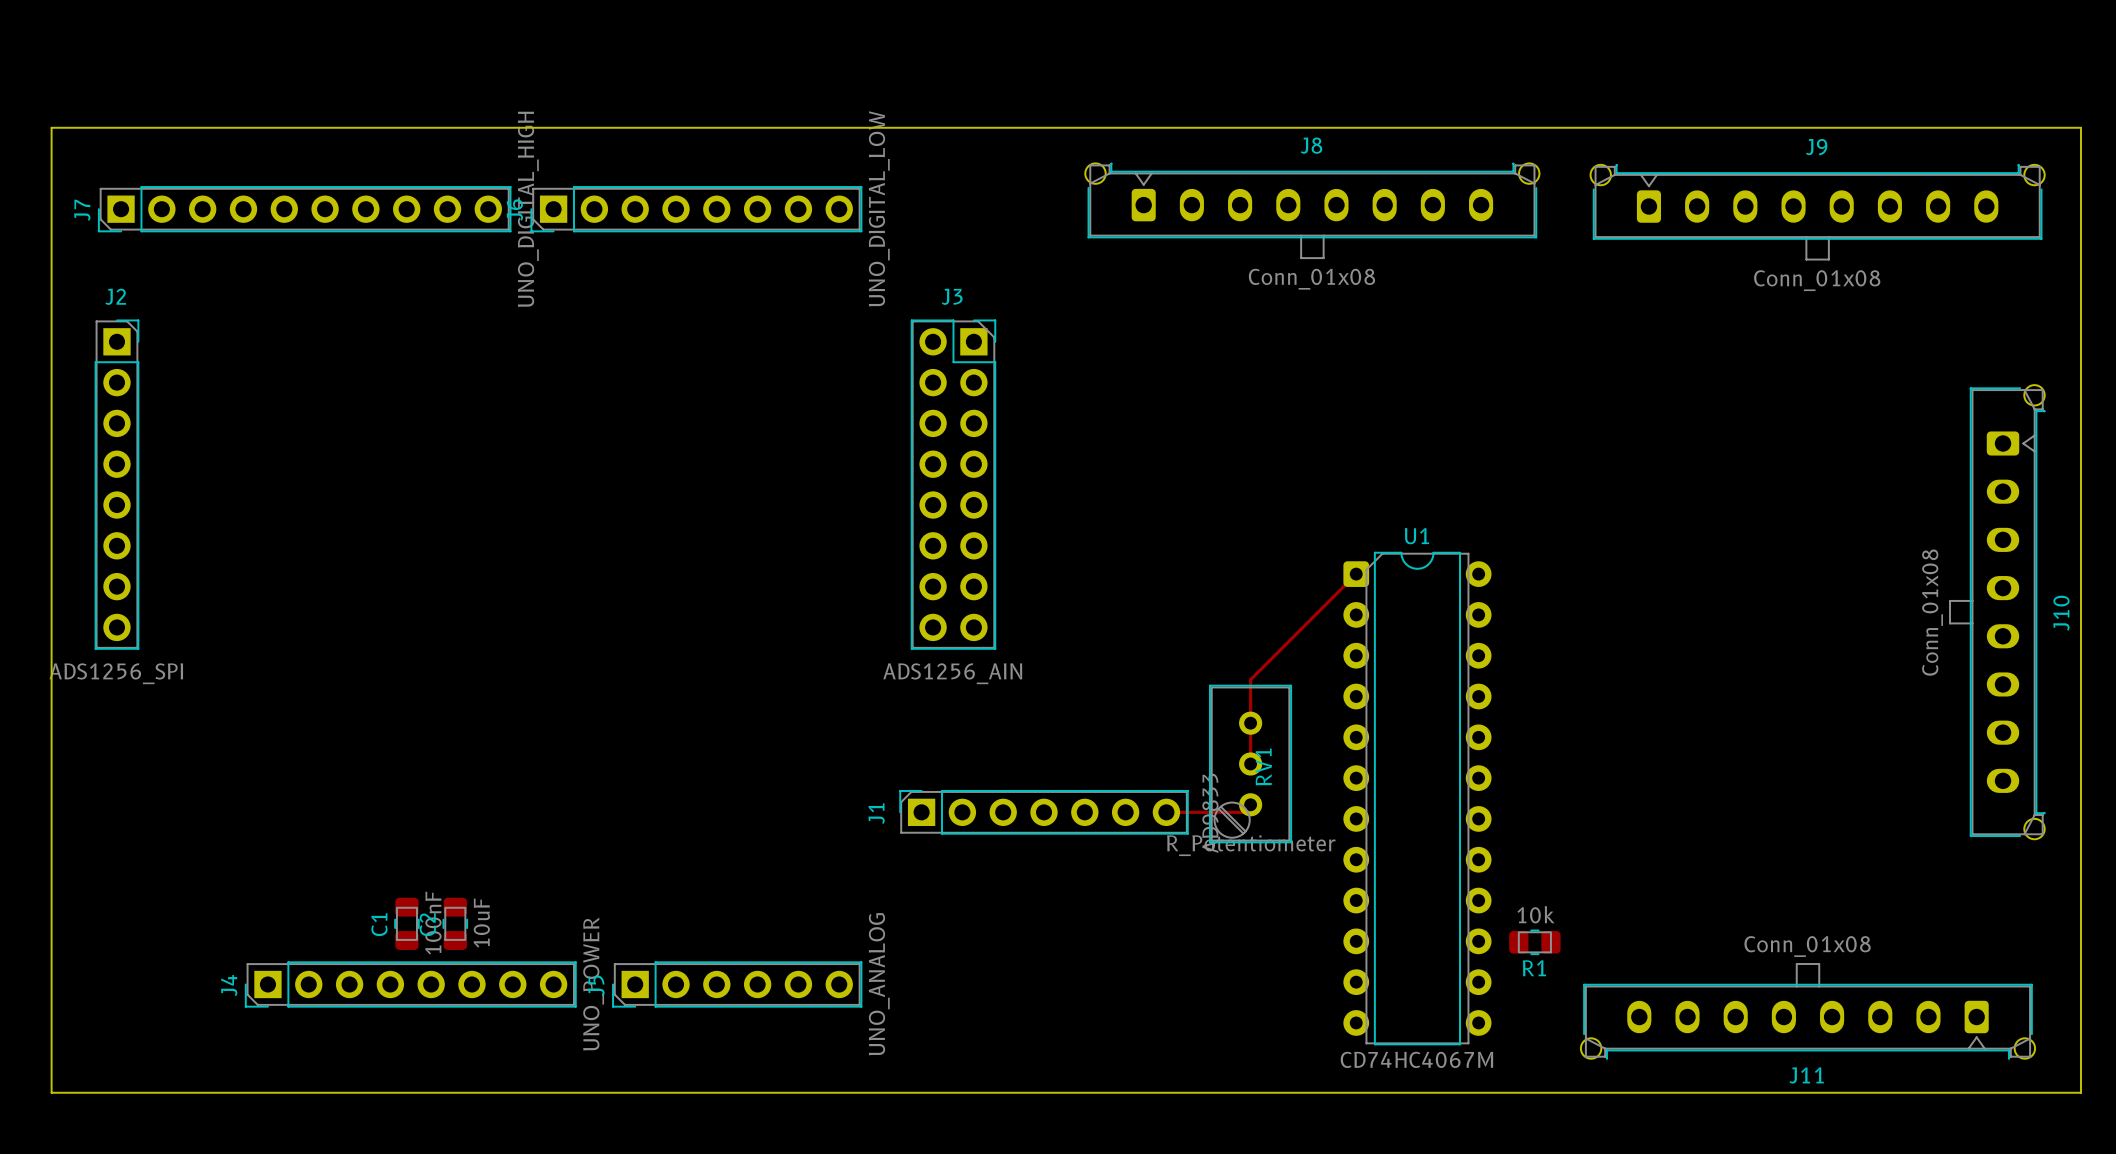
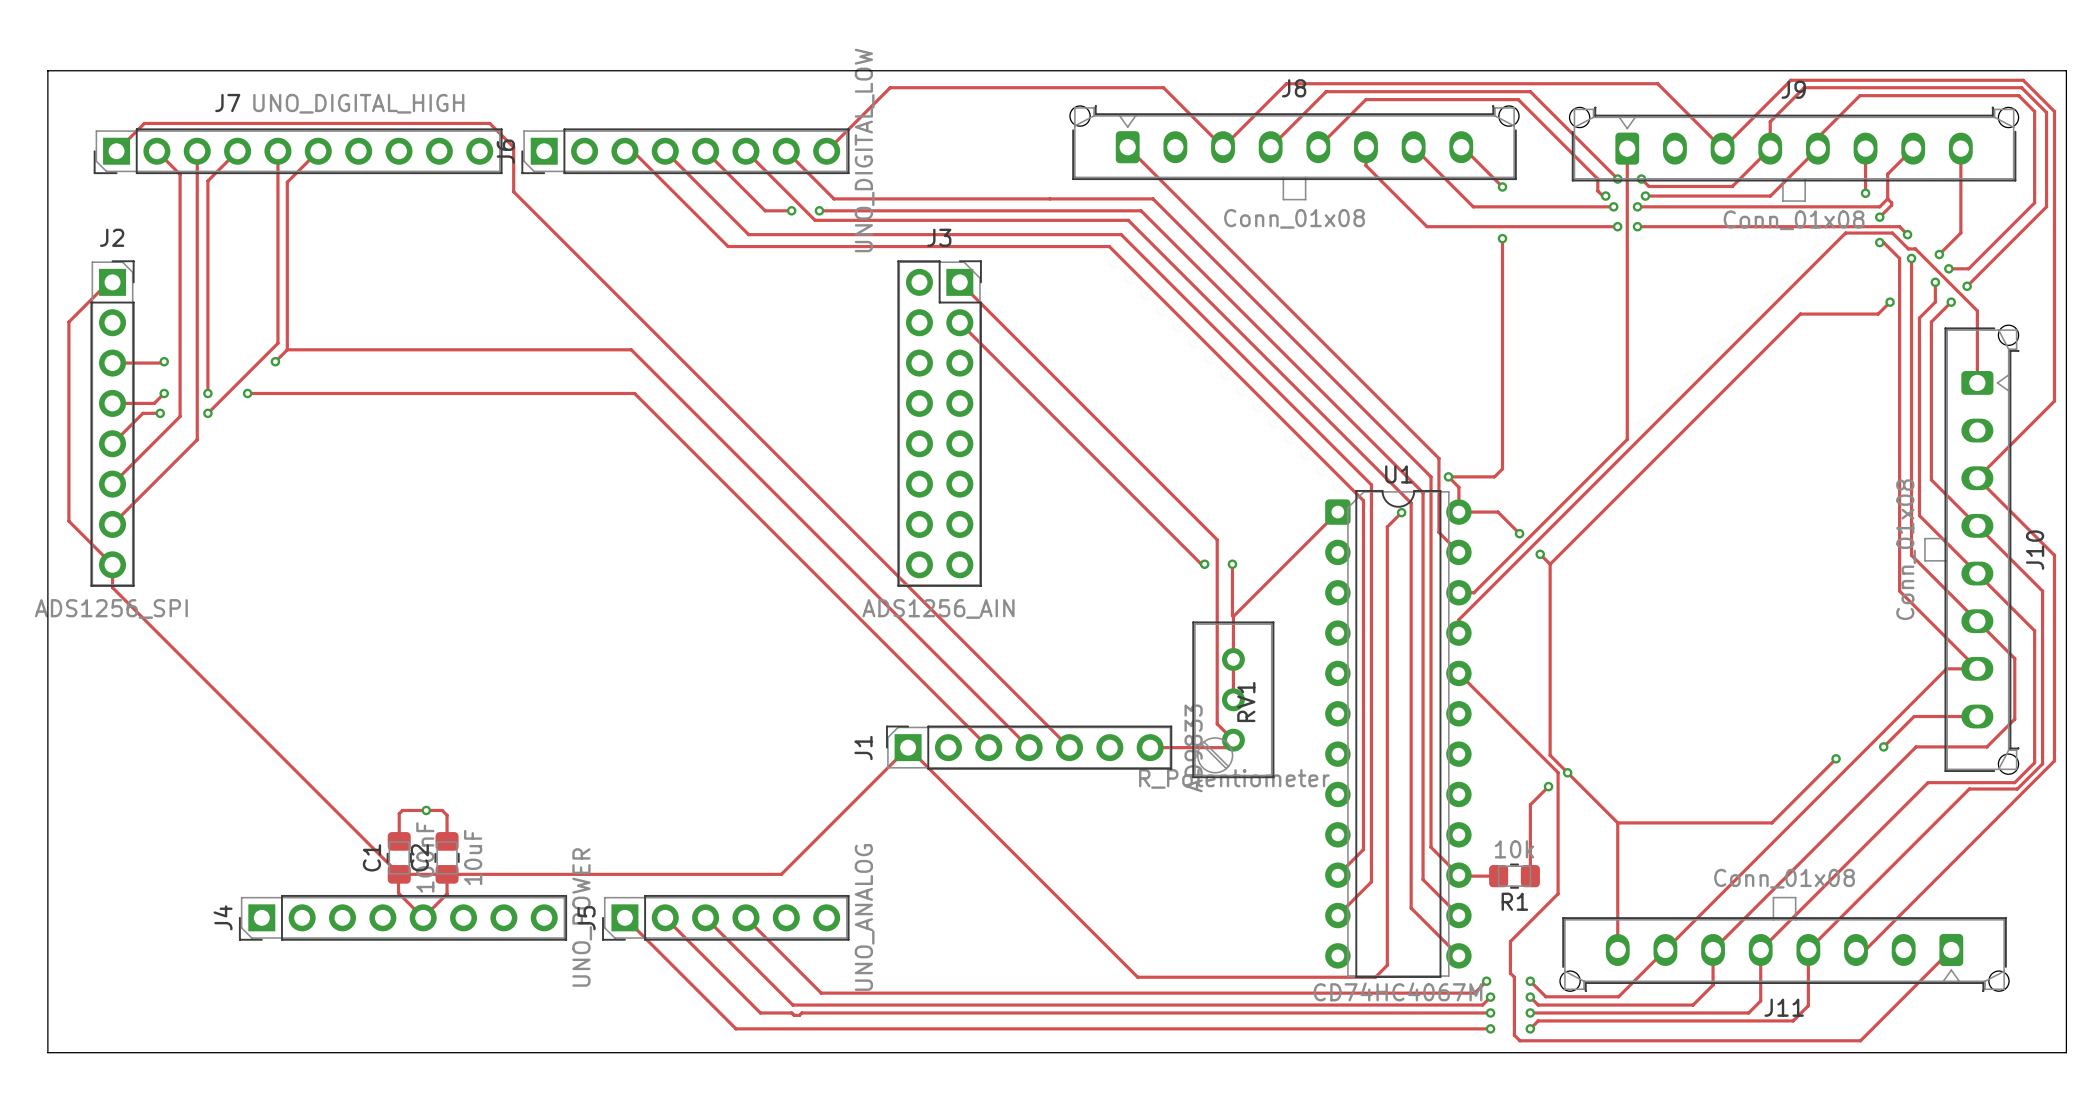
board edge: (2081, 127) (2081, 1092) (51, 1092) -> (2054, 70) (2066, 70) (2066, 1052) (47, 1052) (47, 1024)
track: none -> (1127, 147) (1438, 458) (1438, 532) (1458, 552)
track: none -> (1270, 147) (1326, 91) (1530, 91) (1617, 179)
track: none -> (1318, 147) (1365, 99) (1518, 99) (1597, 179) (1597, 190) (1602, 196) (1605, 196)
track: none -> (1365, 147) (1365, 165) (1427, 226) (1617, 226)
track: none -> (1413, 147) (1473, 206) (1613, 206)
track: none -> (1461, 147) (1502, 186)
track: none -> (1627, 148) (1627, 439) (1473, 592) (1458, 592)
track: none -> (1865, 148) (1865, 193)
track: none -> (1913, 148) (1887, 174) (1887, 198)
track: none -> (1960, 148) (1960, 232) (1939, 254)
track: none -> (116, 151) (144, 123) (489, 123) (513, 147) (513, 191) (1069, 747)
track: none -> (156, 151) (180, 174) (180, 416) (112, 484)
track: none -> (197, 151) (197, 439) (112, 524)
track: none -> (237, 151) (207, 180) (207, 393)
track: none -> (277, 151) (277, 343) (207, 413)
track: none -> (318, 151) (287, 182) (287, 349)
J7 value rotation: 0° (528, 209) -> 90° clockwise (358, 103)
track: none -> (624, 151) (632, 151) (728, 246) (1109, 246) (1363, 500) (1363, 849) (1337, 875)
track: none -> (665, 151) (748, 234) (1121, 234) (1371, 484) (1371, 881) (1337, 915)
track: none -> (705, 151) (765, 210) (791, 210)
track: none -> (745, 151) (815, 220) (1128, 220) (1411, 503) (1411, 908) (1458, 955)
track: none -> (786, 151) (833, 198) (1153, 198) (1431, 476) (1431, 847) (1459, 876) (1498, 876)
track: none -> (826, 151) (890, 87) (1163, 87) (1223, 147) (1286, 83) (1657, 83) (1722, 148) (1790, 80) (2023, 80) (2054, 111) (2054, 401) (1977, 478) (2054, 555) (2054, 760) (1865, 950) (1856, 950)
J7 name rotation: 0° (82, 210) -> 90° clockwise (227, 103)
J7 name position: J7 (82, 210) -> J7 (227, 103)
via: none -> (1617, 179)
track: none -> (1641, 179) (1648, 186) (1732, 186) (1770, 148) (1770, 121) (1804, 87) (2021, 87) (2046, 112) (2046, 206) (1967, 286)
via: none -> (1641, 179)
via: none -> (1502, 186)
via: none -> (1865, 193)
via: none -> (1605, 196)
track: none -> (1645, 196) (1770, 196) (1817, 148) (1817, 137) (1859, 95) (2018, 95) (2034, 111) (2034, 202) (1968, 268) (1948, 268)
via: none -> (1645, 196)
track: none -> (1887, 198) (1891, 205) (1879, 217)
track: none -> (1887, 198) (1879, 206) (1637, 206)
via: none -> (1613, 206)
via: none -> (1637, 206)
via: none -> (791, 210)
track: none -> (819, 210) (1141, 210) (1423, 492) (1423, 879) (1458, 915)
via: none -> (819, 210)
via: none -> (1879, 217)
via: none -> (1617, 226)
track: none -> (1637, 226) (1899, 226) (1907, 234)
via: none -> (1637, 226)
via: none -> (1907, 234)
track: none -> (1502, 238) (1502, 468) (1494, 476) (1448, 476) (1458, 487) (1458, 512) (1497, 512) (1519, 533)
via: none -> (1502, 238)
track: none -> (1879, 242) (1883, 242) (1899, 258) (1899, 591) (1977, 668) (1946, 668) (1618, 996) (1545, 996) (1530, 981)
via: none -> (1879, 242)
via: none -> (1939, 254)
track: none -> (1911, 258) (1911, 555) (2014, 658) (2014, 719) (1986, 746) (1916, 746) (1713, 950) (1713, 985) (1693, 1005) (1538, 1005) (1530, 997)
via: none -> (1911, 258)
via: none -> (1948, 268)
track: none -> (112, 282) (108, 282) (68, 322) (68, 521) (112, 564) (112, 587) (399, 874)
track: none -> (959, 282) (1217, 539) (1217, 723) (1233, 740)
track: none -> (1935, 282) (1935, 302) (1919, 318) (1919, 515) (2034, 630) (2034, 762) (2014, 782) (1928, 782) (1760, 950) (1760, 1000) (1748, 1012) (1530, 1012)
via: none -> (1935, 282)
via: none -> (1967, 286)
track: none -> (1890, 302) (1878, 314) (1800, 314) (1550, 564)
via: none -> (1890, 302)
track: none -> (1951, 302) (1931, 322) (1931, 479) (2042, 591) (2042, 763) (2017, 789) (1969, 789) (1808, 950) (1808, 1005) (1793, 1020) (1538, 1020) (1530, 1028)
via: none -> (1951, 302)
track: none -> (959, 322) (1201, 564) (1204, 564)
track: none -> (287, 349) (631, 349) (1029, 747)
track: none -> (287, 349) (275, 361)
track: none -> (164, 361) (112, 363)
via: none -> (164, 361)
via: none -> (275, 361)
track: none -> (1977, 382) (1977, 310) (1915, 248) (1908, 248) (1892, 233) (1845, 233) (1458, 619) (1458, 633)
track: none -> (164, 393) (154, 403) (112, 403)
via: none -> (164, 393)
via: none -> (207, 393)
track: none -> (247, 393) (634, 393) (988, 747)
via: none -> (247, 393)
track: none -> (160, 413) (142, 413) (112, 443)
via: none -> (160, 413)
via: none -> (207, 413)
via: none -> (1448, 476)
track: none -> (1401, 512) (1387, 526) (1387, 965) (1375, 977) (1137, 977) (908, 747) (781, 874) (399, 874)
via: none -> (1401, 512)
via: none -> (1519, 533)
track: none -> (1540, 554) (1550, 564)
via: none -> (1540, 554)
via: none -> (1204, 564)
track: none -> (1232, 564) (1233, 616)
via: none -> (1232, 564)
track: none -> (1550, 564) (1550, 755) (1617, 822)
track: none -> (1458, 673) (1558, 772) (1558, 893) (1510, 941) (1510, 973) (1514, 977) (1514, 1035) (1519, 1040) (1860, 1040) (1951, 950)
track: none -> (1977, 716) (1914, 716) (1883, 746)
via: none -> (1883, 746)
track: none -> (1836, 758) (1771, 822) (1617, 822)
via: none -> (1836, 758)
via: none -> (1567, 772)
track: none -> (1548, 786) (1530, 804) (1530, 876)
via: none -> (1548, 786)
via: none -> (426, 810)
track: none -> (1617, 822) (1617, 950)
track: none -> (399, 841) (399, 813) (402, 810) (442, 810) (447, 815) (447, 841)
track: none -> (399, 874) (398, 893) (423, 917) (447, 893) (447, 874)
track: none -> (624, 917) (735, 1028) (1490, 1028)
track: none -> (665, 917) (760, 1012) (791, 1012) (794, 1015) (799, 1015) (801, 1012) (1490, 1012)
track: none -> (705, 917) (792, 1005) (1482, 1005) (1490, 997)
track: none -> (745, 917) (821, 993) (1474, 993) (1486, 981)
via: none -> (1486, 981)
via: none -> (1530, 981)
via: none -> (1490, 997)
via: none -> (1530, 997)
via: none -> (1490, 1012)
via: none -> (1530, 1012)
via: none -> (1490, 1028)
via: none -> (1530, 1028)

